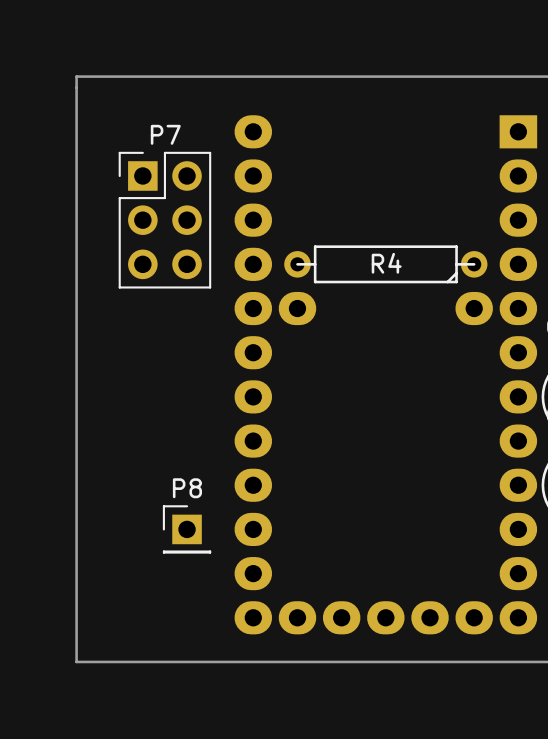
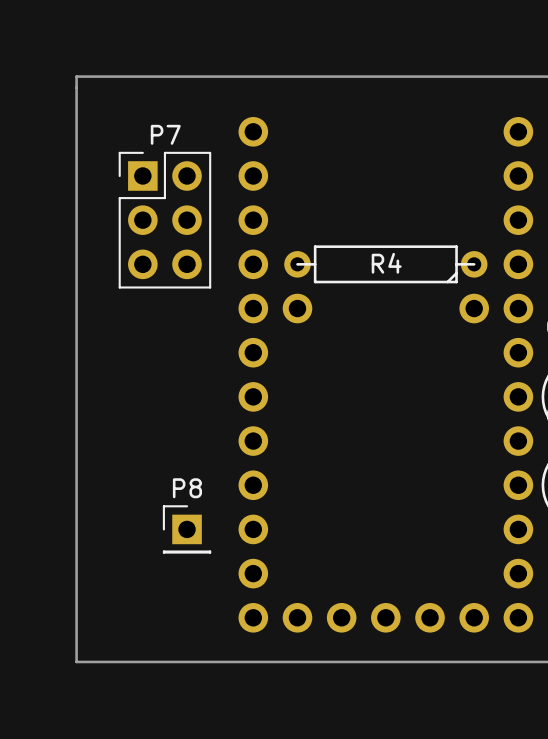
part footprint: [234, 115, 538, 635] -> [238, 117, 534, 633]

